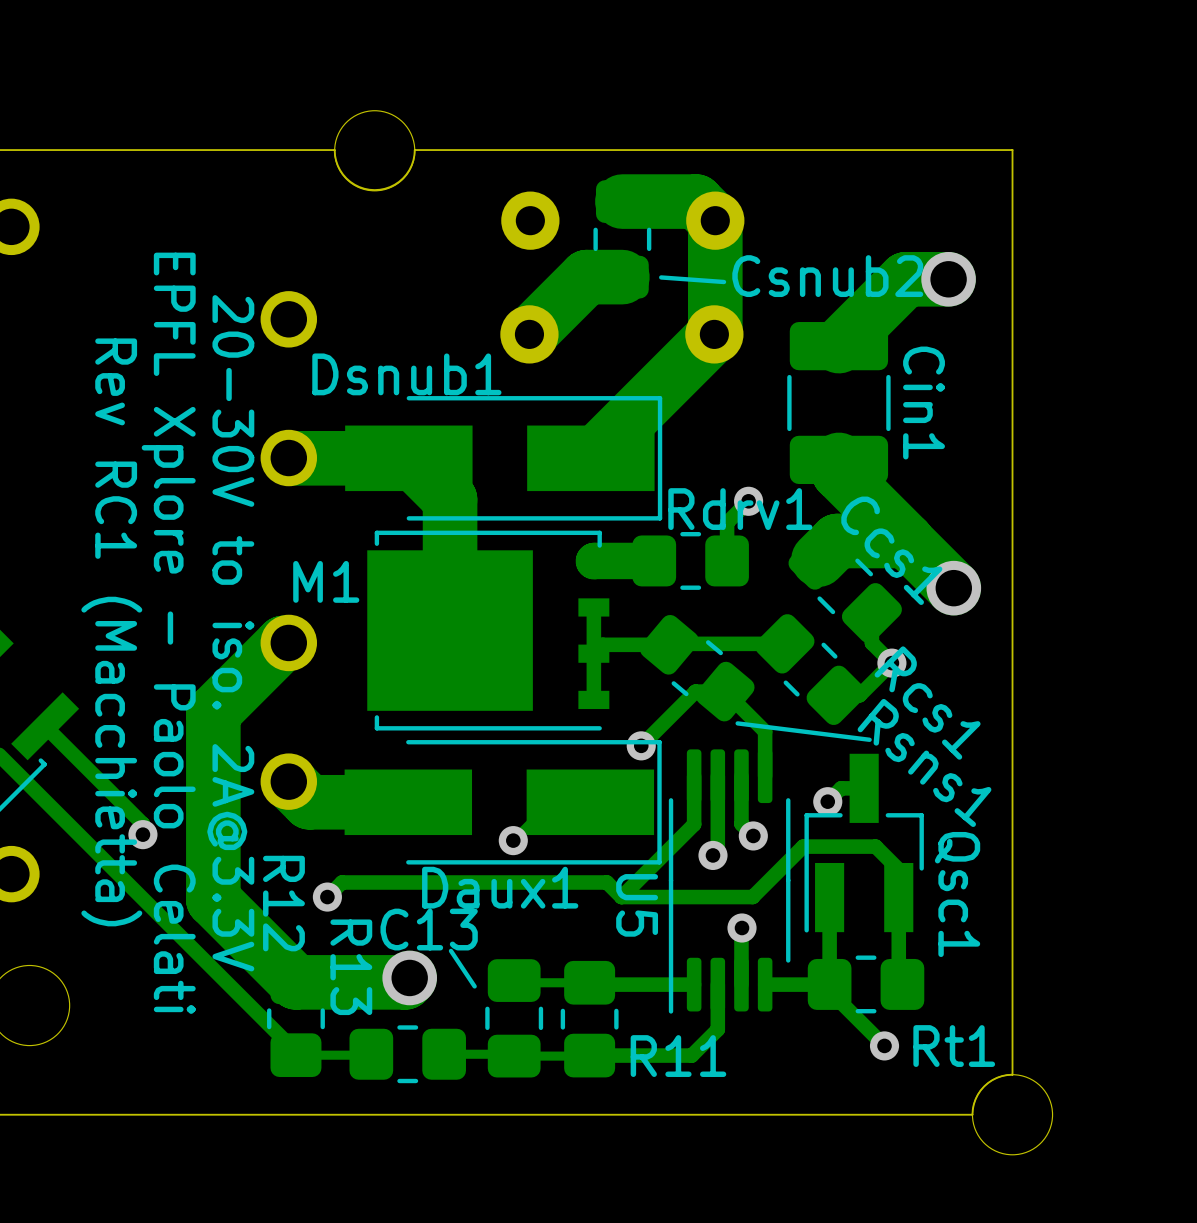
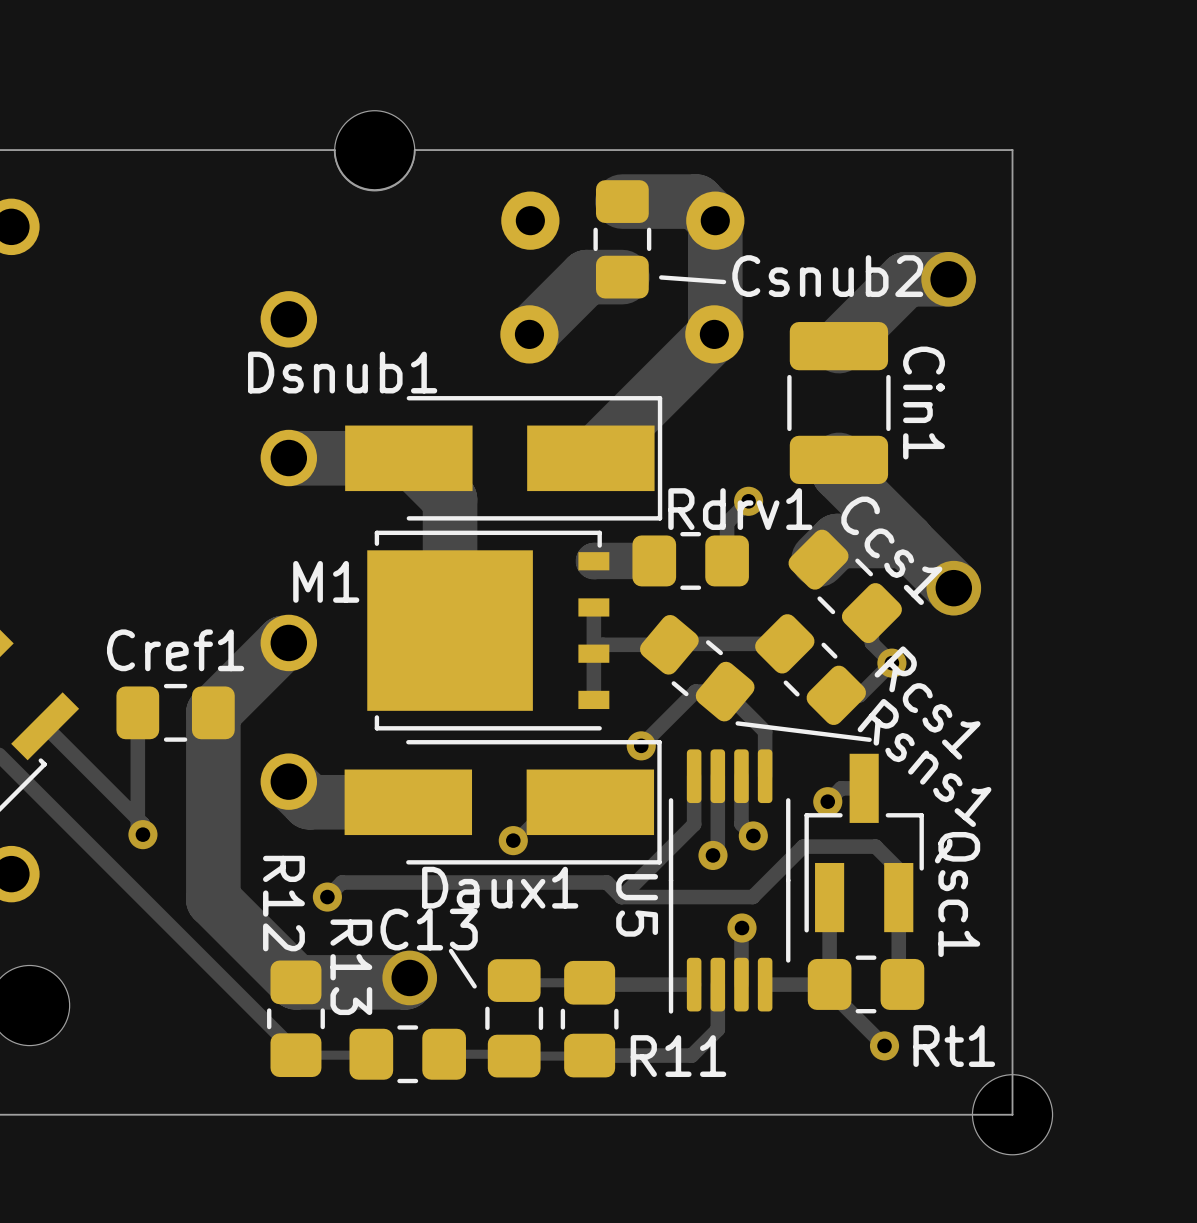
Dsnub1 name position: Dsnub1 (406, 374) -> Dsnub1 (342, 372)
text: Rev RC1 (Macchietta) (111, 632) -> none
text: EPFL Xplore - Paolo Celati (168, 633) -> none
text: 20-30V to iso. 2A@3.3V (230, 633) -> none
track: none -> (137, 712) (137, 829)
Cref1: none -> (175, 712)
board edge: (1012, 1074) (997, 1077) (984, 1086) (975, 1099) (972, 1114) -> (1012, 1074) (1012, 1114) (972, 1114)

